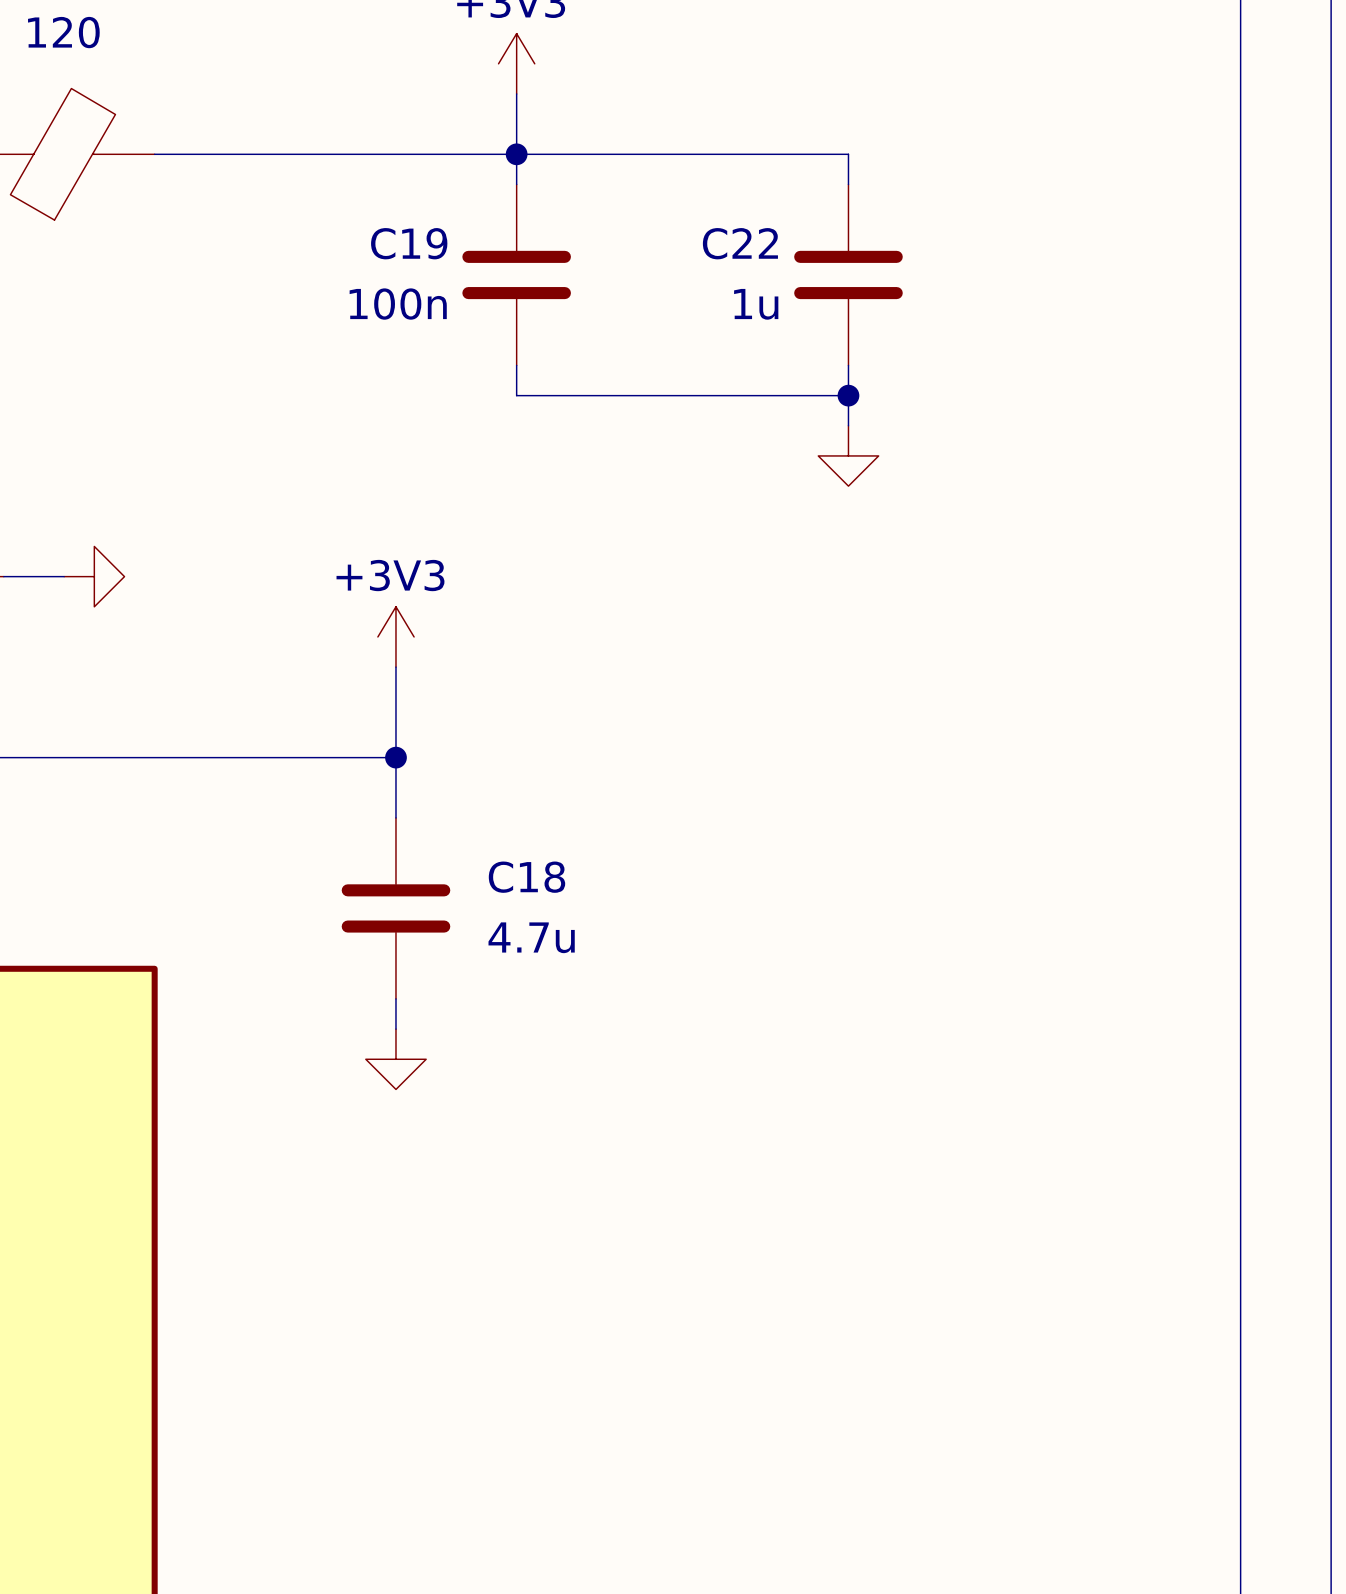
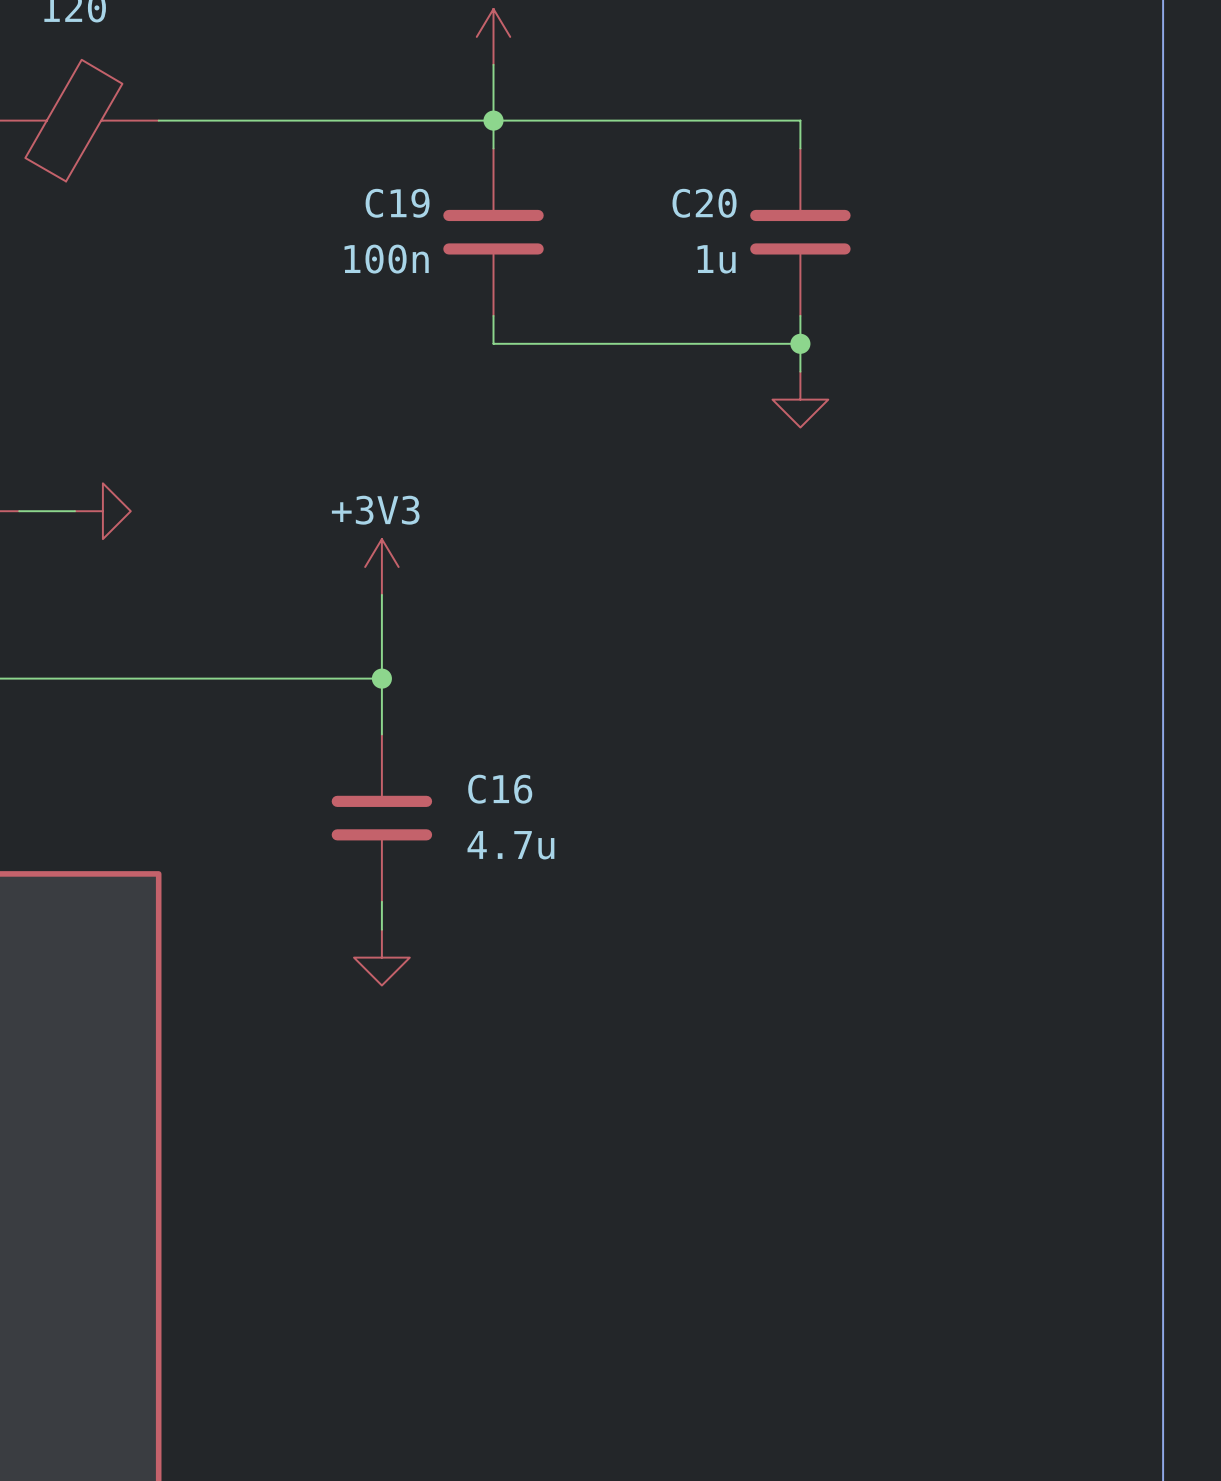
C22 name: C22 (740, 243) -> C20 (704, 203)
C18 name: C18 (527, 877) -> C16 (500, 789)

